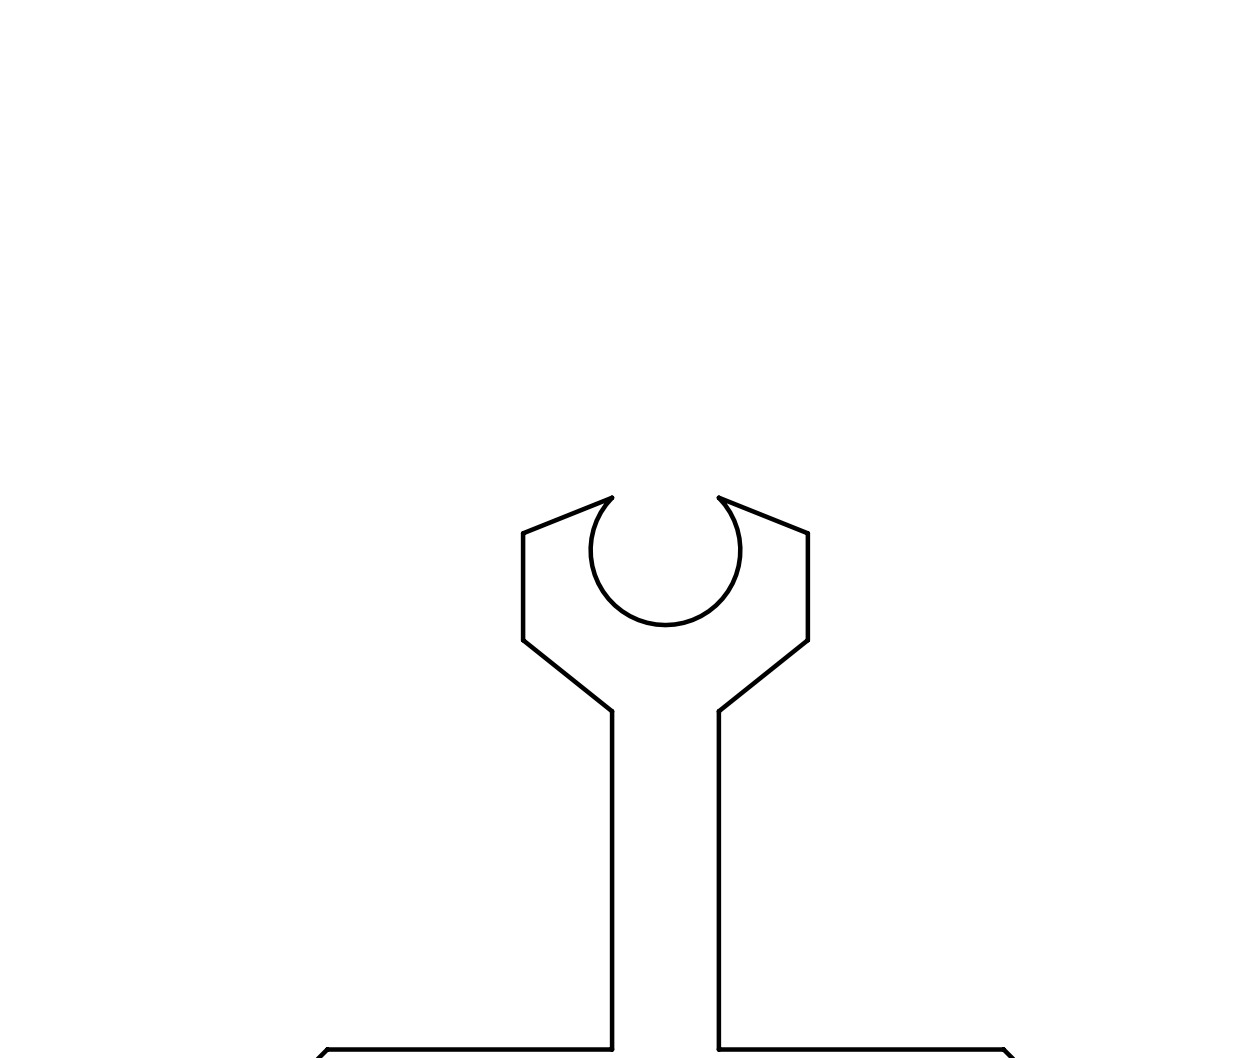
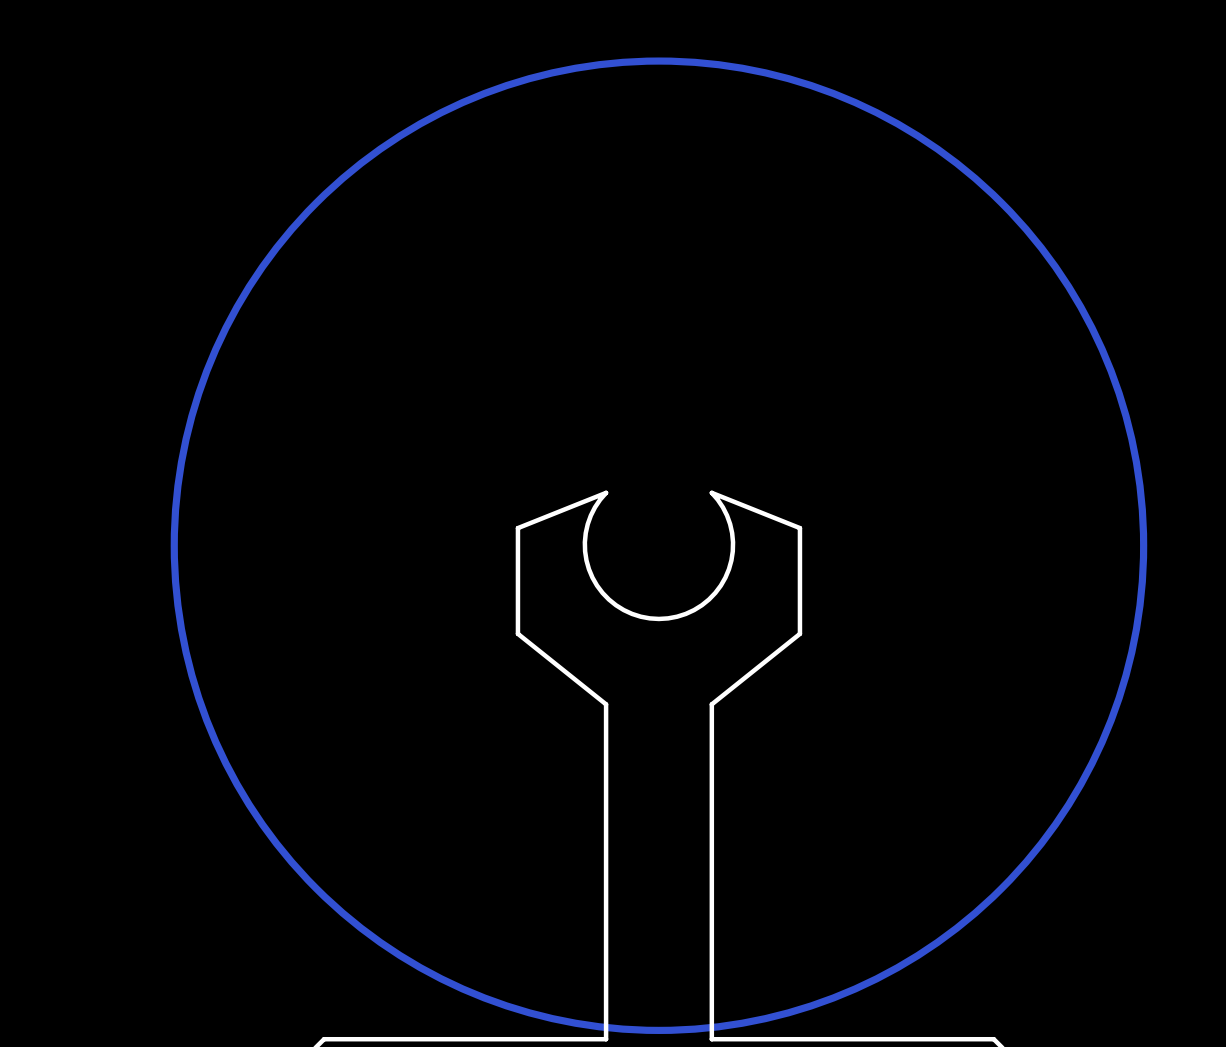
drawing: none -> [170, 57, 1148, 1034]

